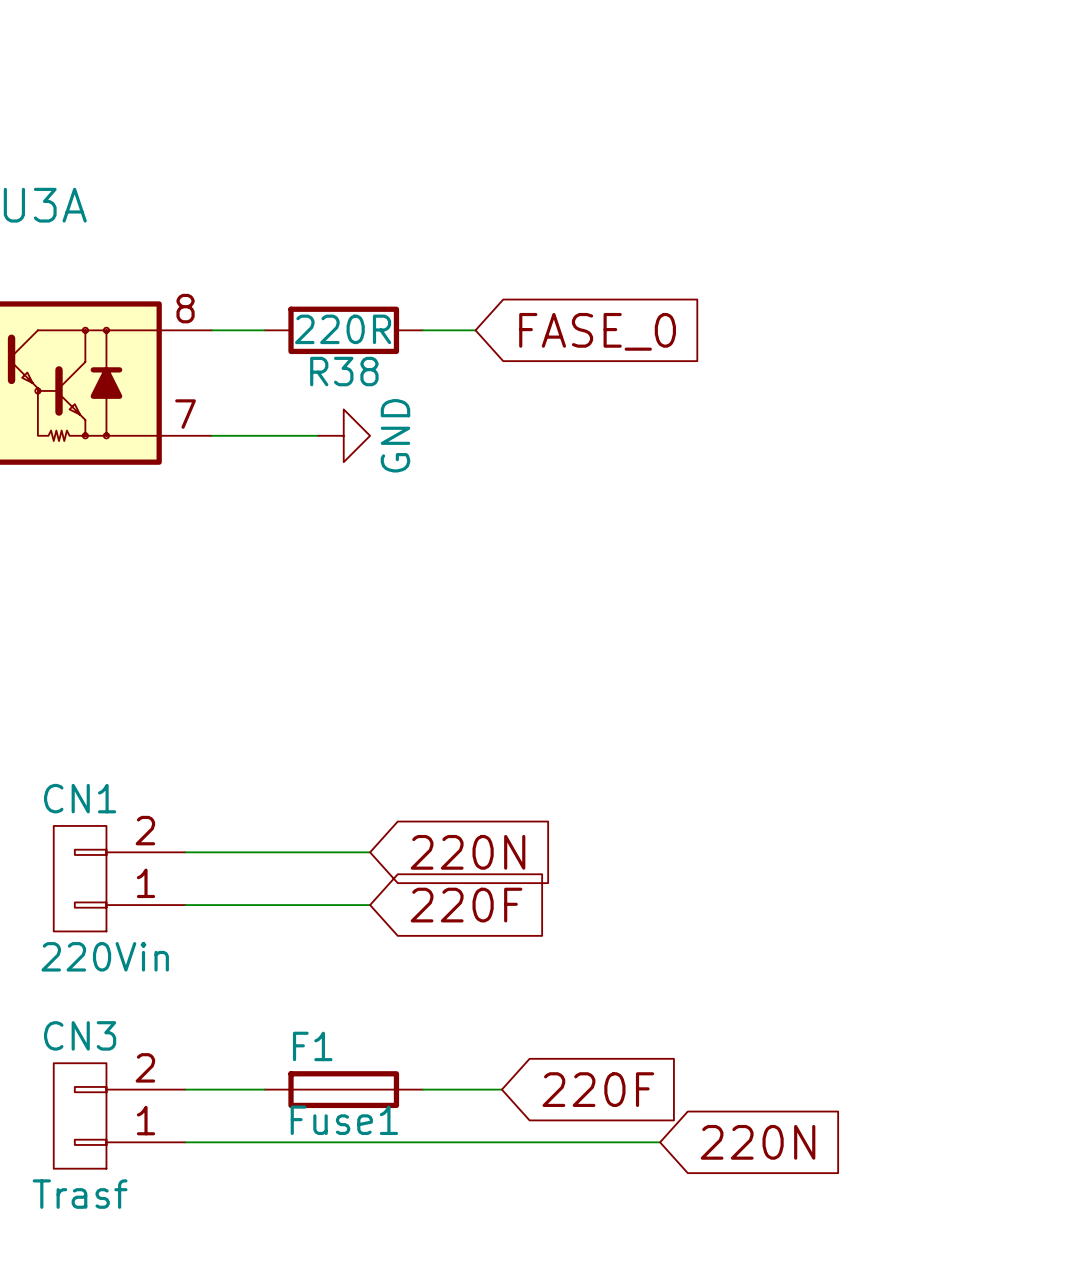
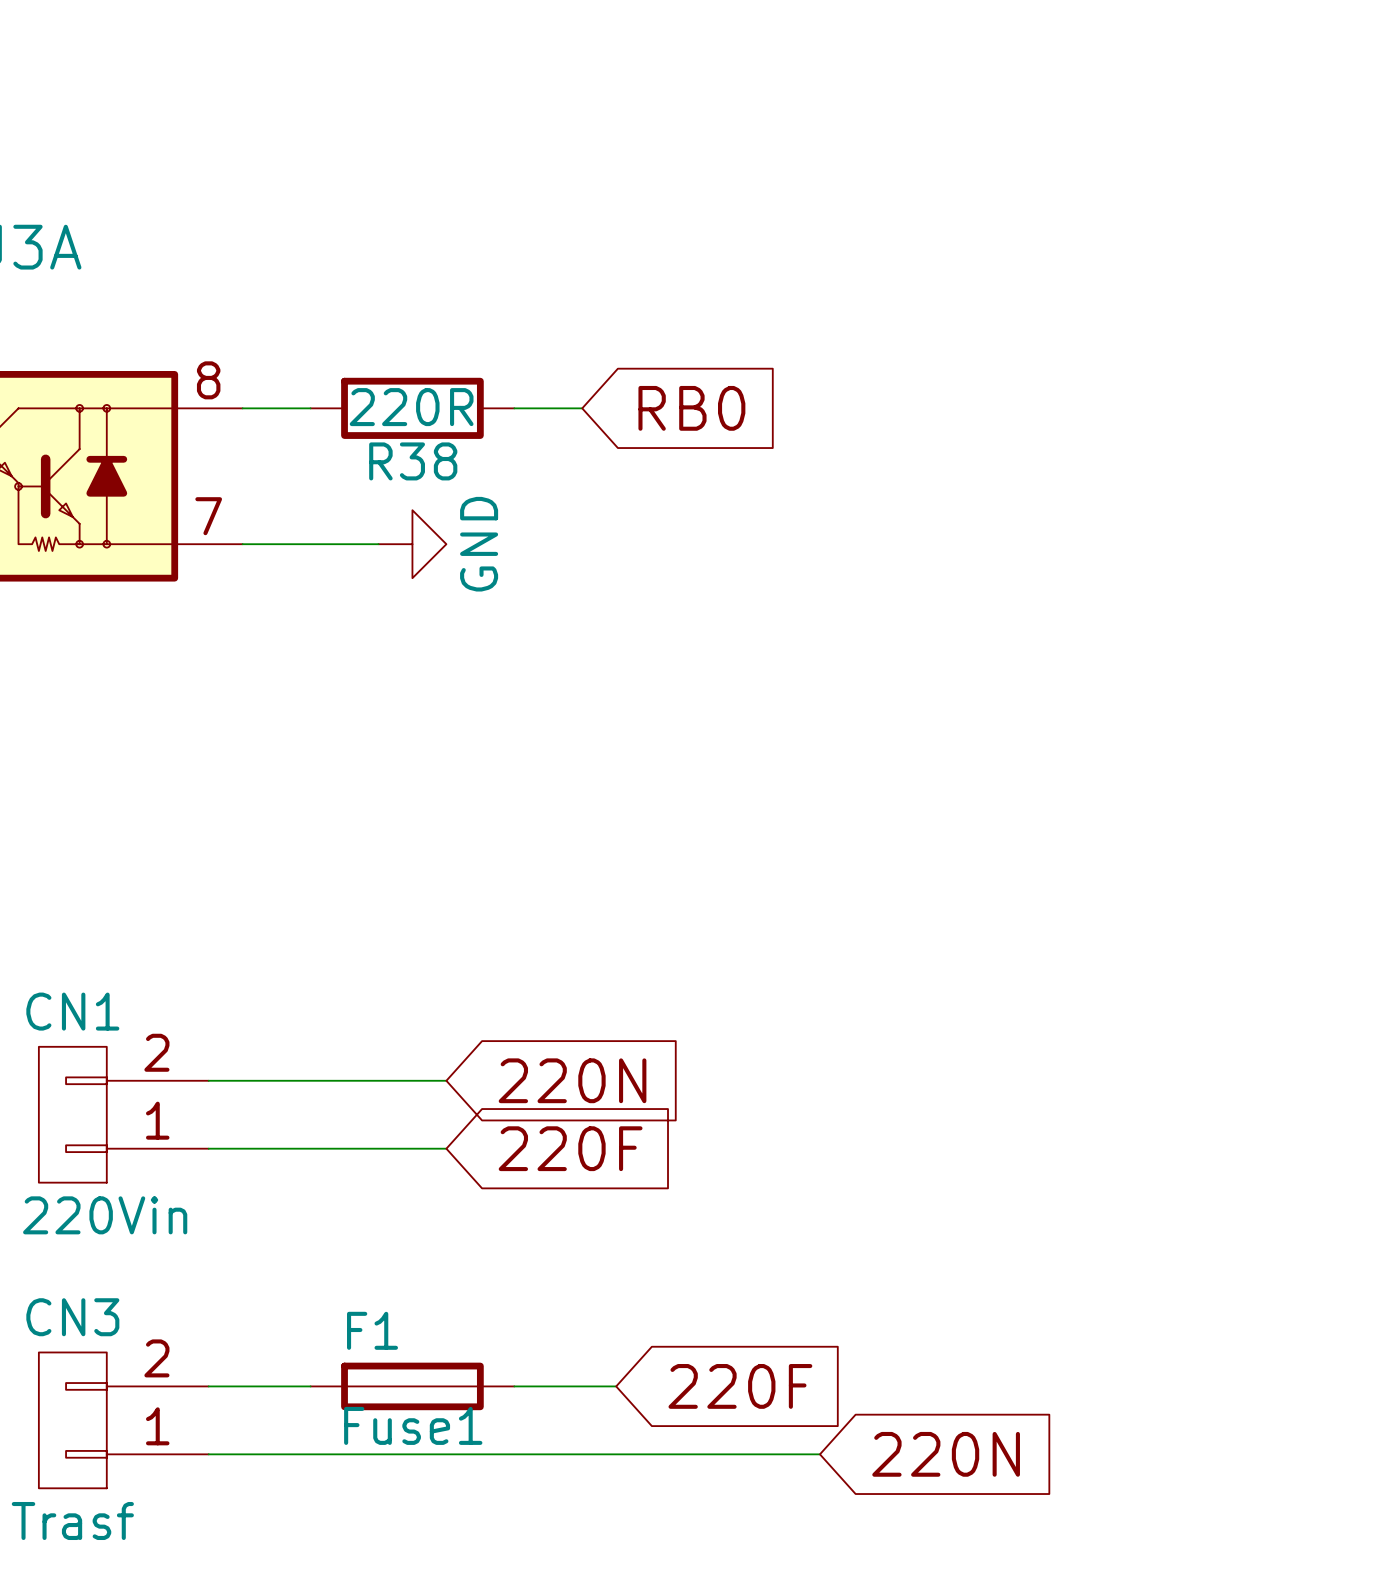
global label: FASE_0 (597, 331) -> RB0 (691, 408)

